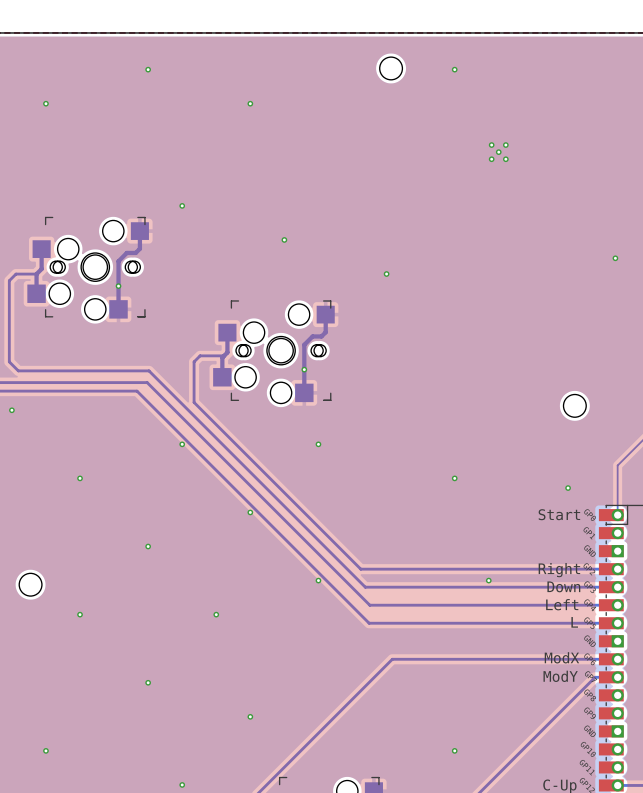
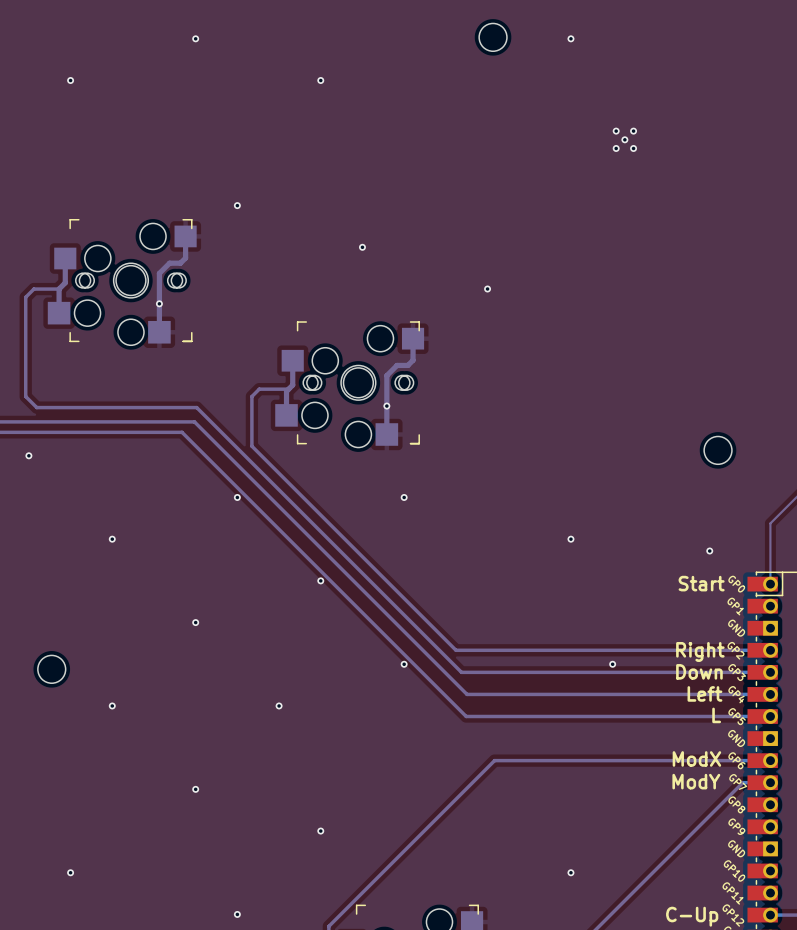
via: (615, 258) -> none

